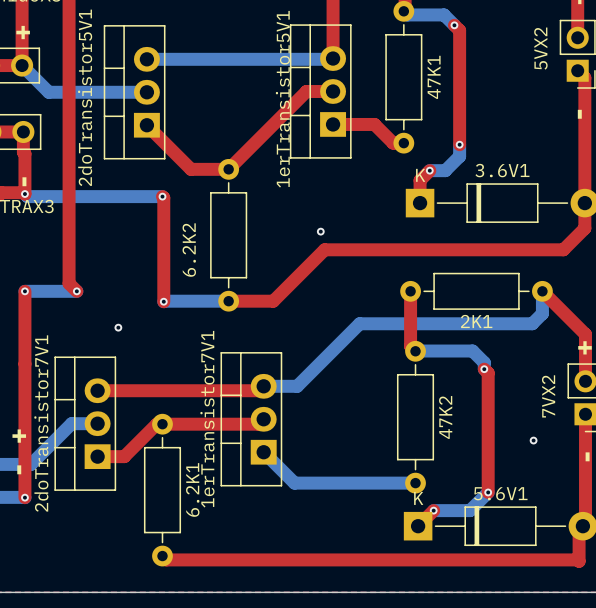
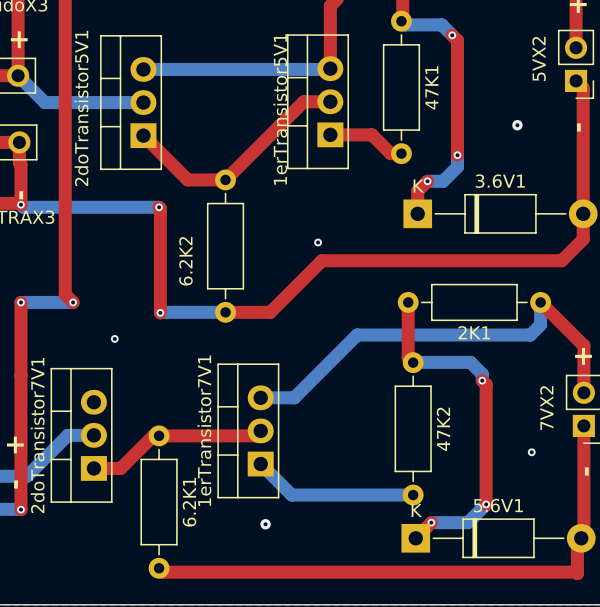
via: none -> (517, 125)
top track: (97, 390) (259, 390) -> none
via: none -> (265, 524)

